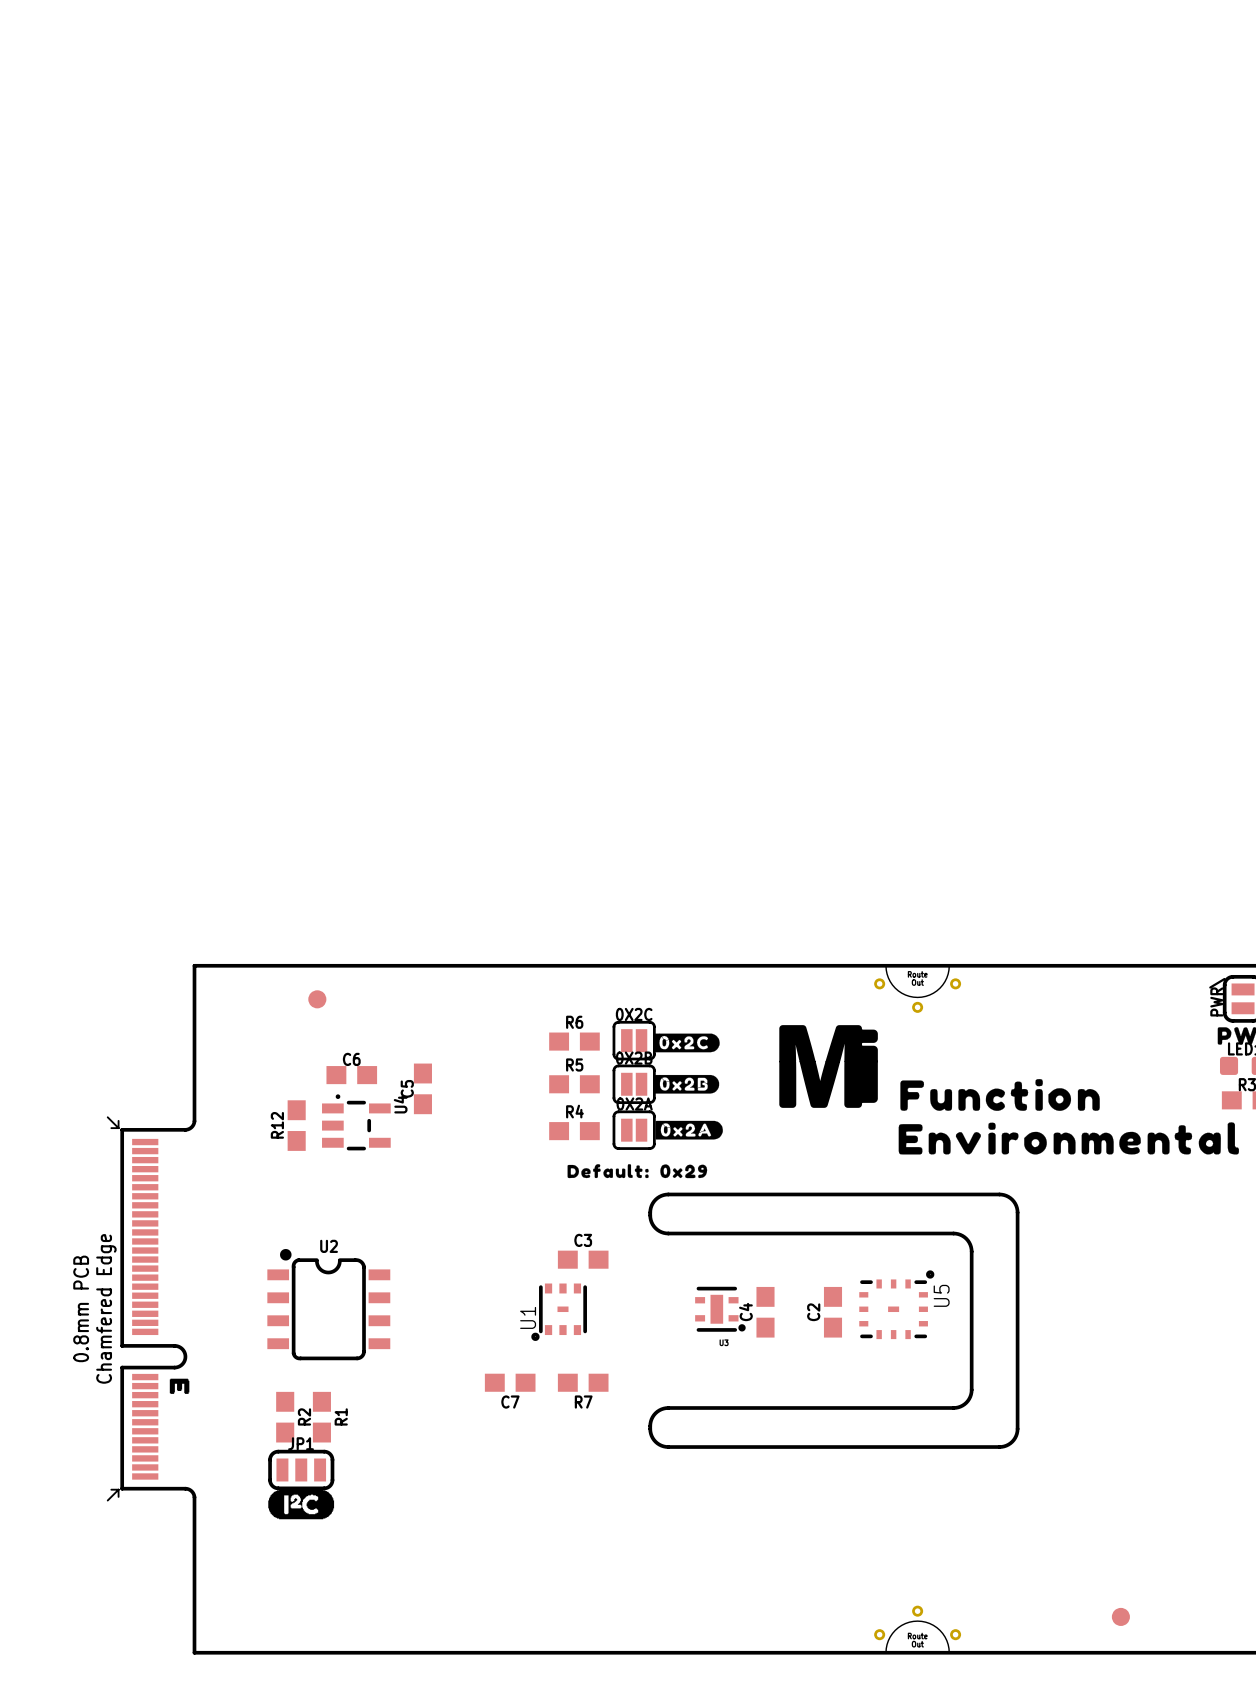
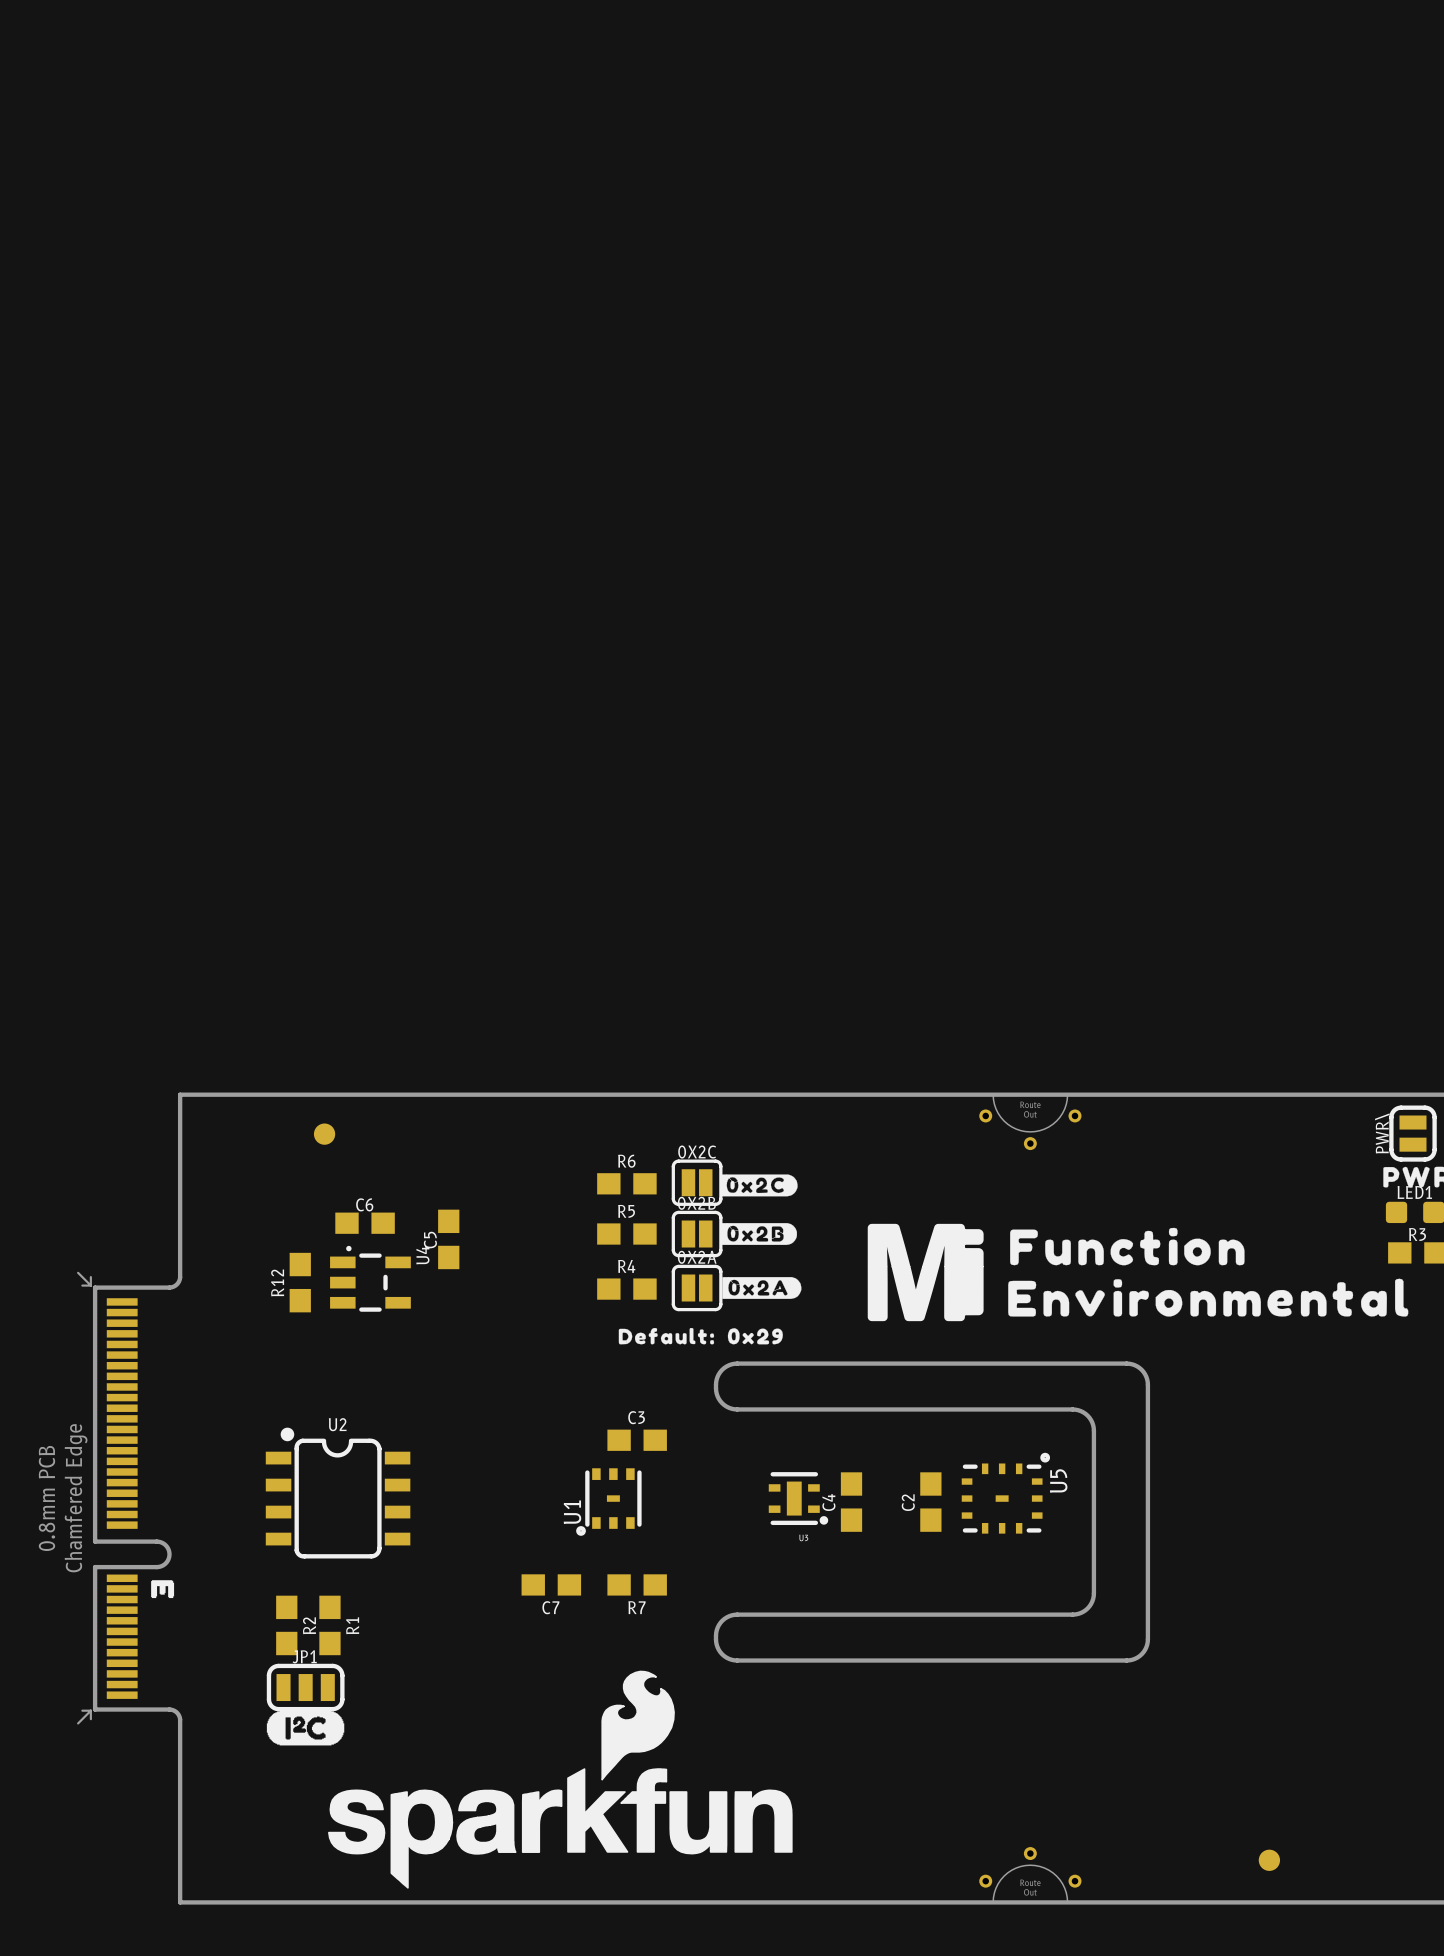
drawing position: (828, 1066) -> (925, 1272)
drawing: none -> [328, 1670, 793, 1889]

